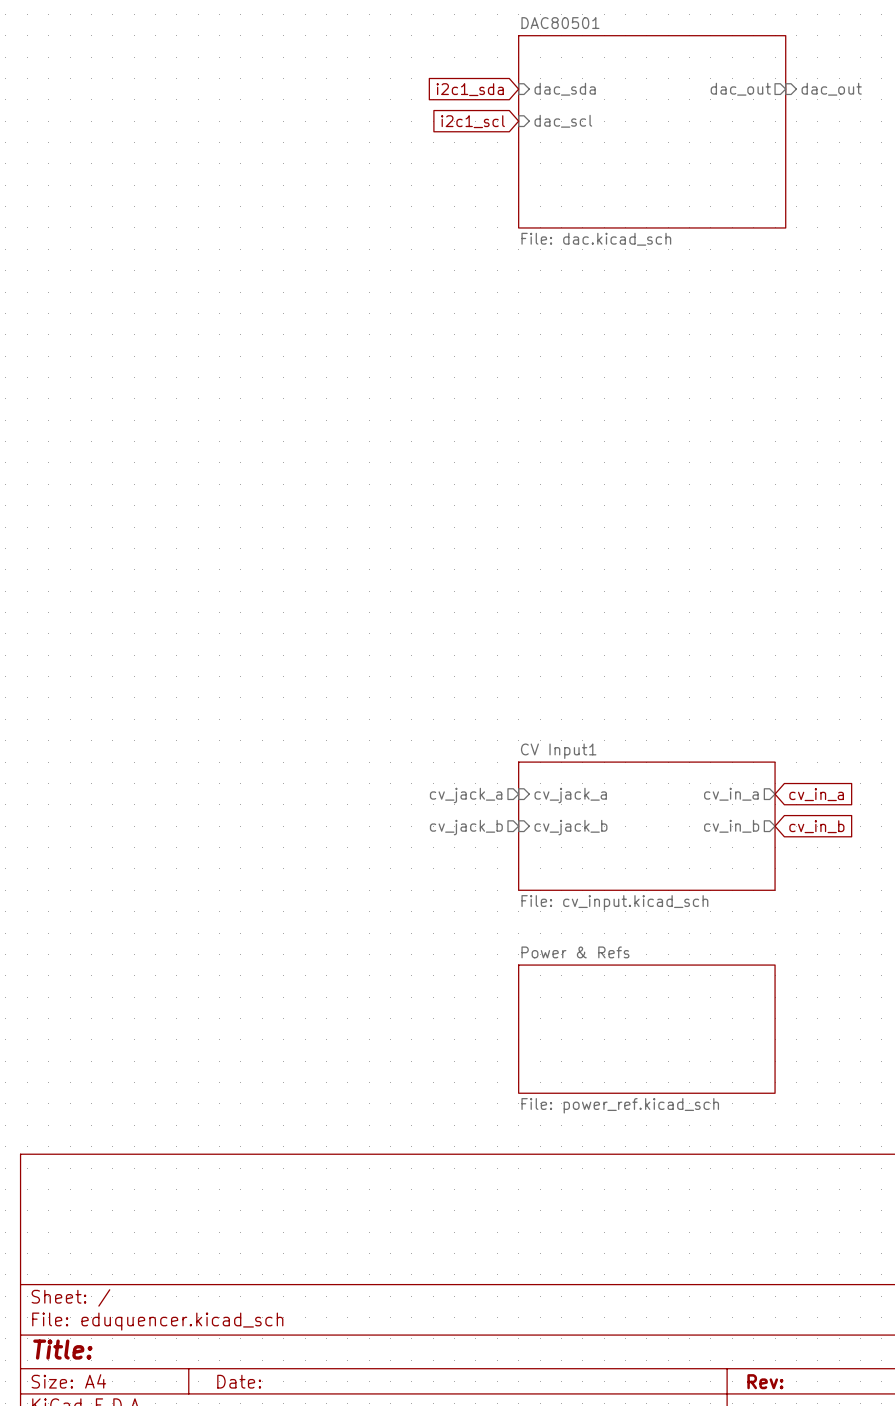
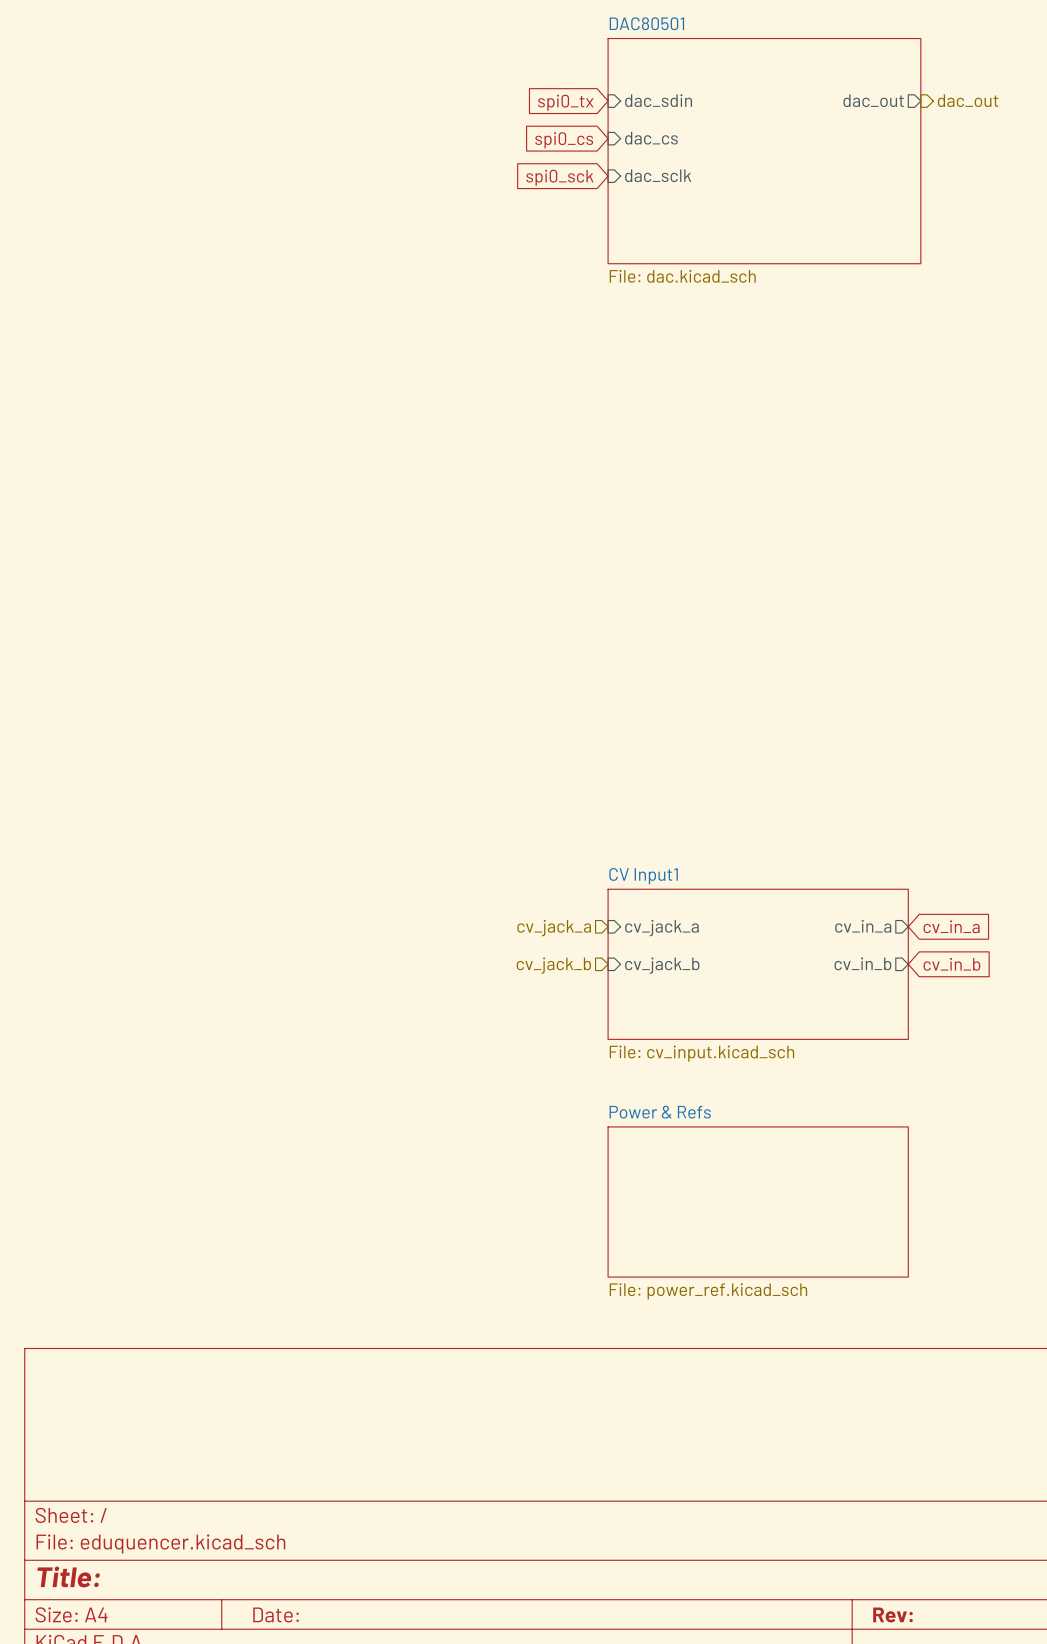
global label: i2c1_sda (470, 89) -> spi0_tx (565, 102)
sheet pin: dac_sda (565, 89) -> dac_sdin (658, 100)
global label: i2c1_scl (472, 121) -> spi0_cs (564, 140)
sheet pin: dac_scl (563, 121) -> dac_cs (651, 138)
sheet pin: none -> dac_sclk (658, 175)
global label: none -> spi0_sck (559, 177)

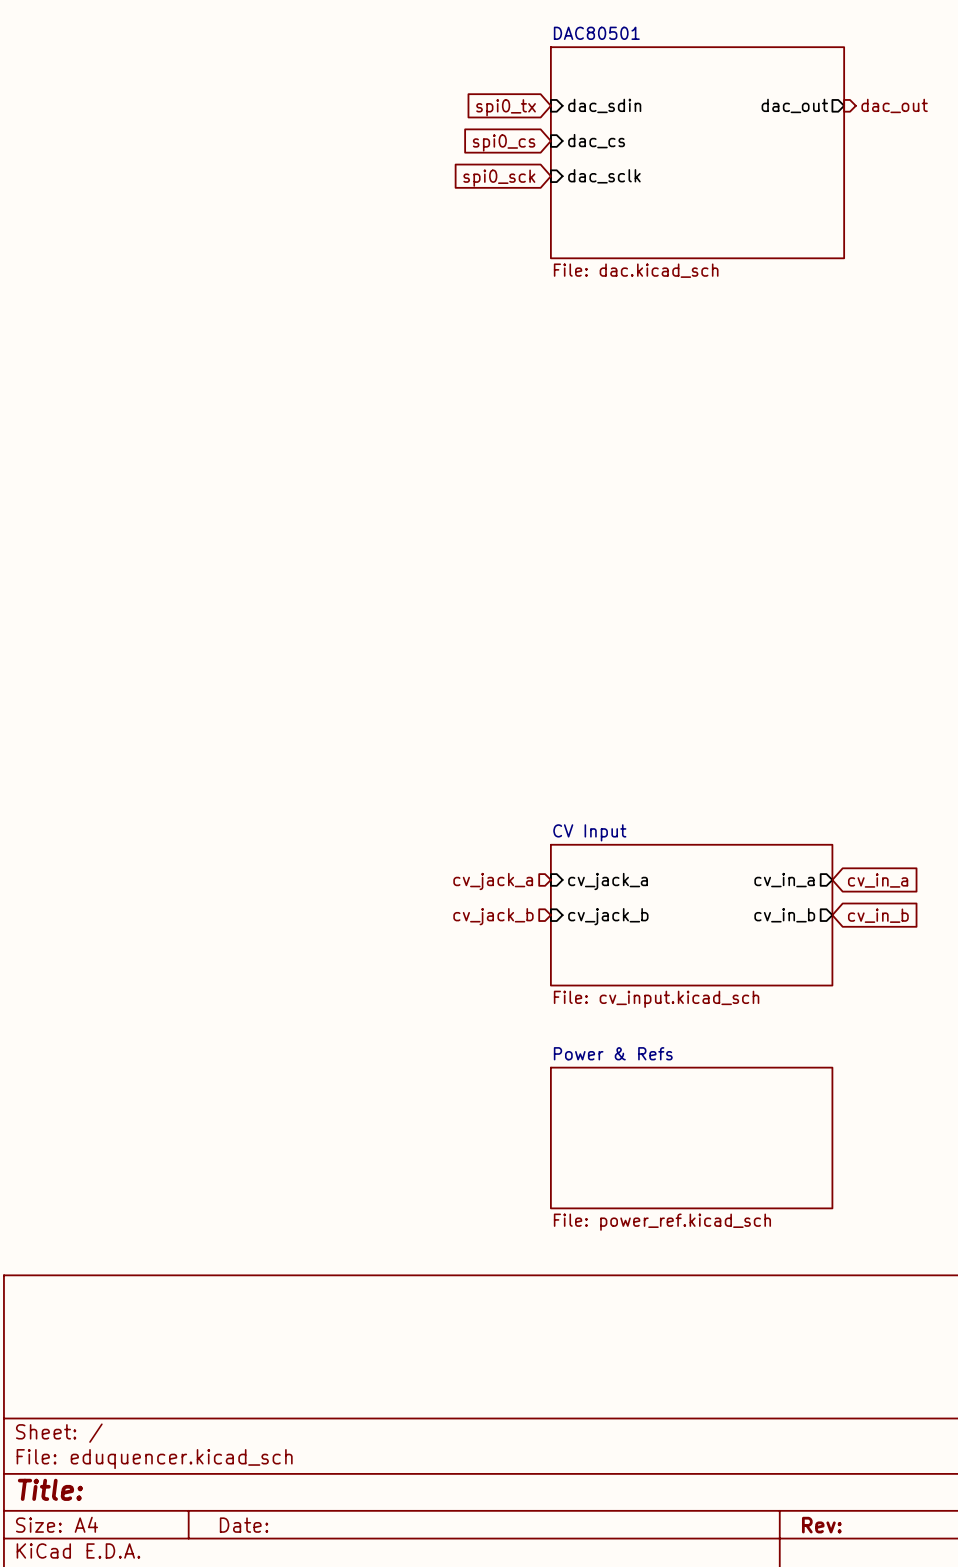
sheet CV Input1 name: CV Input1 (643, 876) -> CV Input (589, 832)

